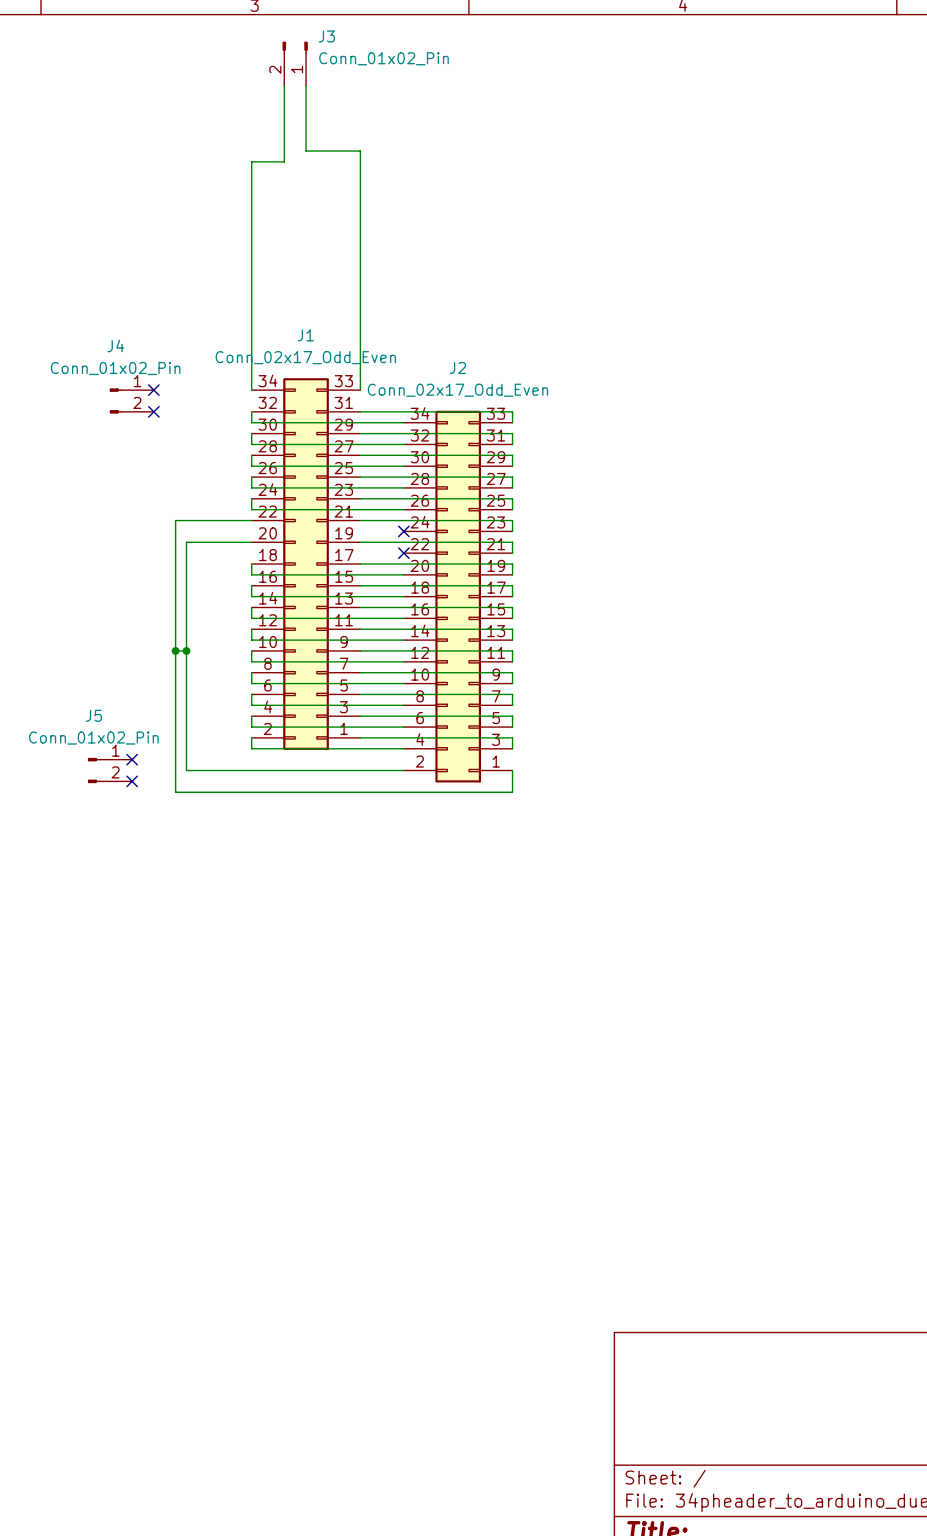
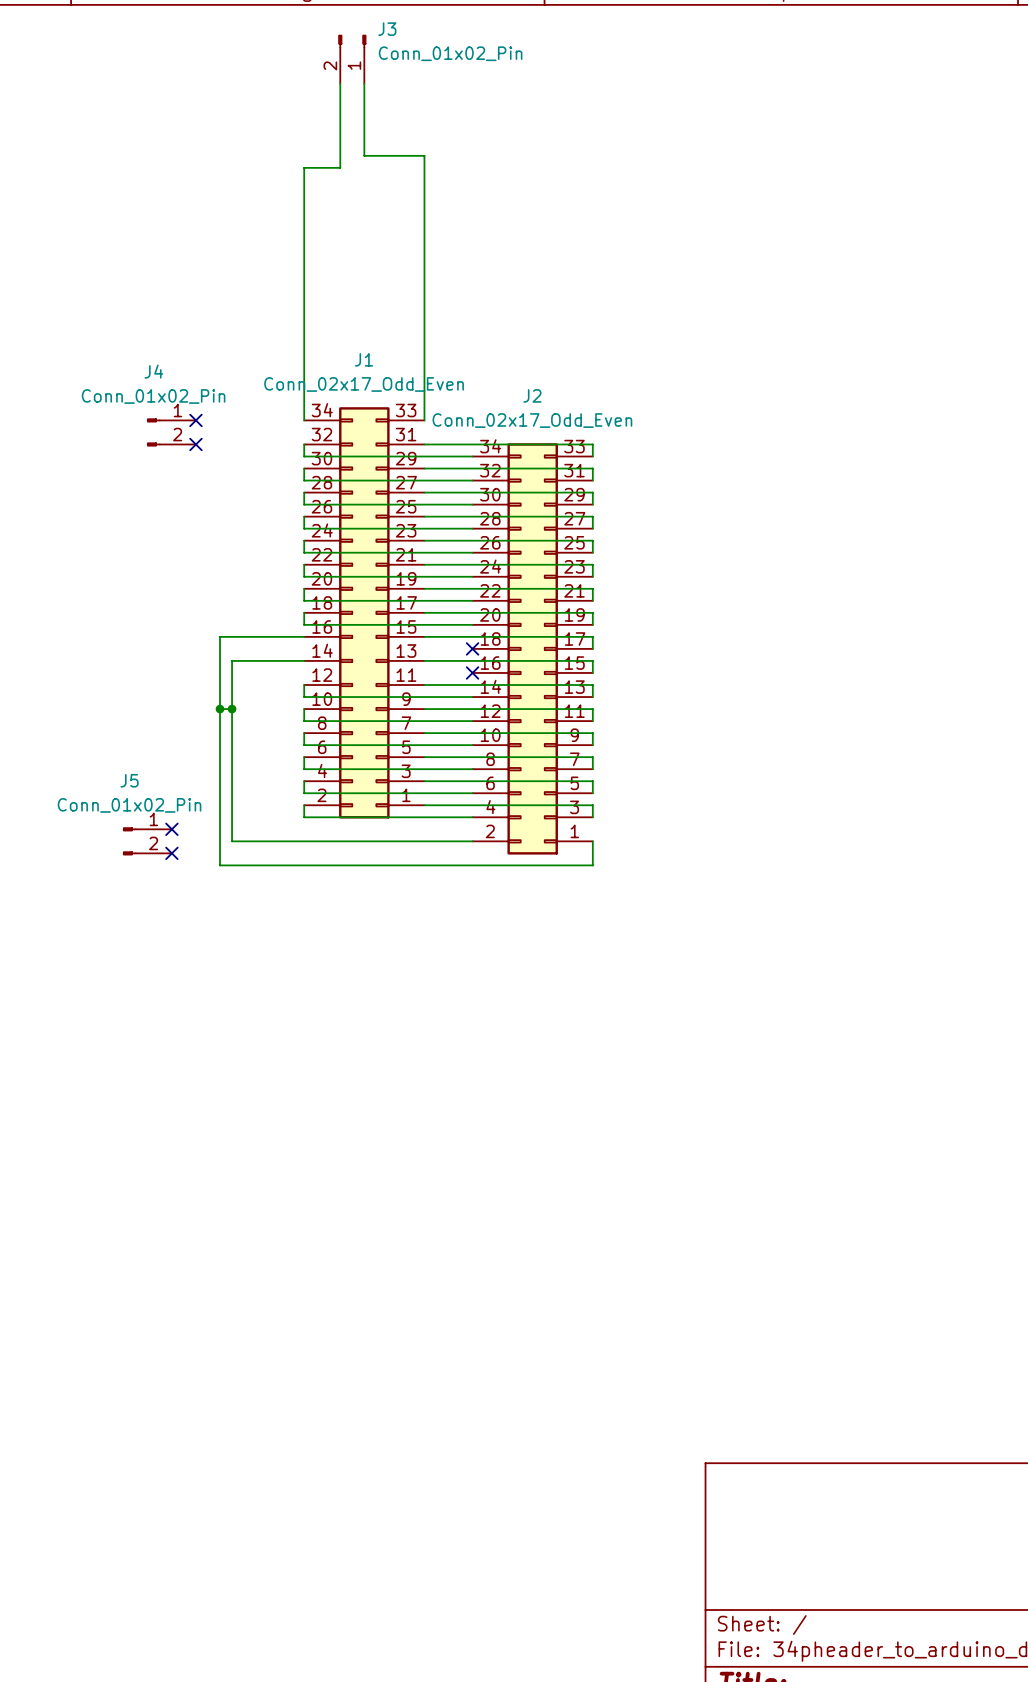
wire: (251, 520) (175, 520) (175, 585) -> (304, 636) (220, 636)
no-connect mark: (403, 531) -> none
wire: (251, 542) (186, 542) (186, 607) -> (304, 660) (232, 660)
no-connect mark: (403, 553) -> none
wire: (251, 585) (251, 596) (403, 596) -> (304, 588) (304, 600) (472, 600)
no-connect mark: none -> (472, 648)
wire: (251, 607) (251, 618) (403, 618) -> (304, 564) (304, 576) (472, 576)
no-connect mark: none -> (472, 672)

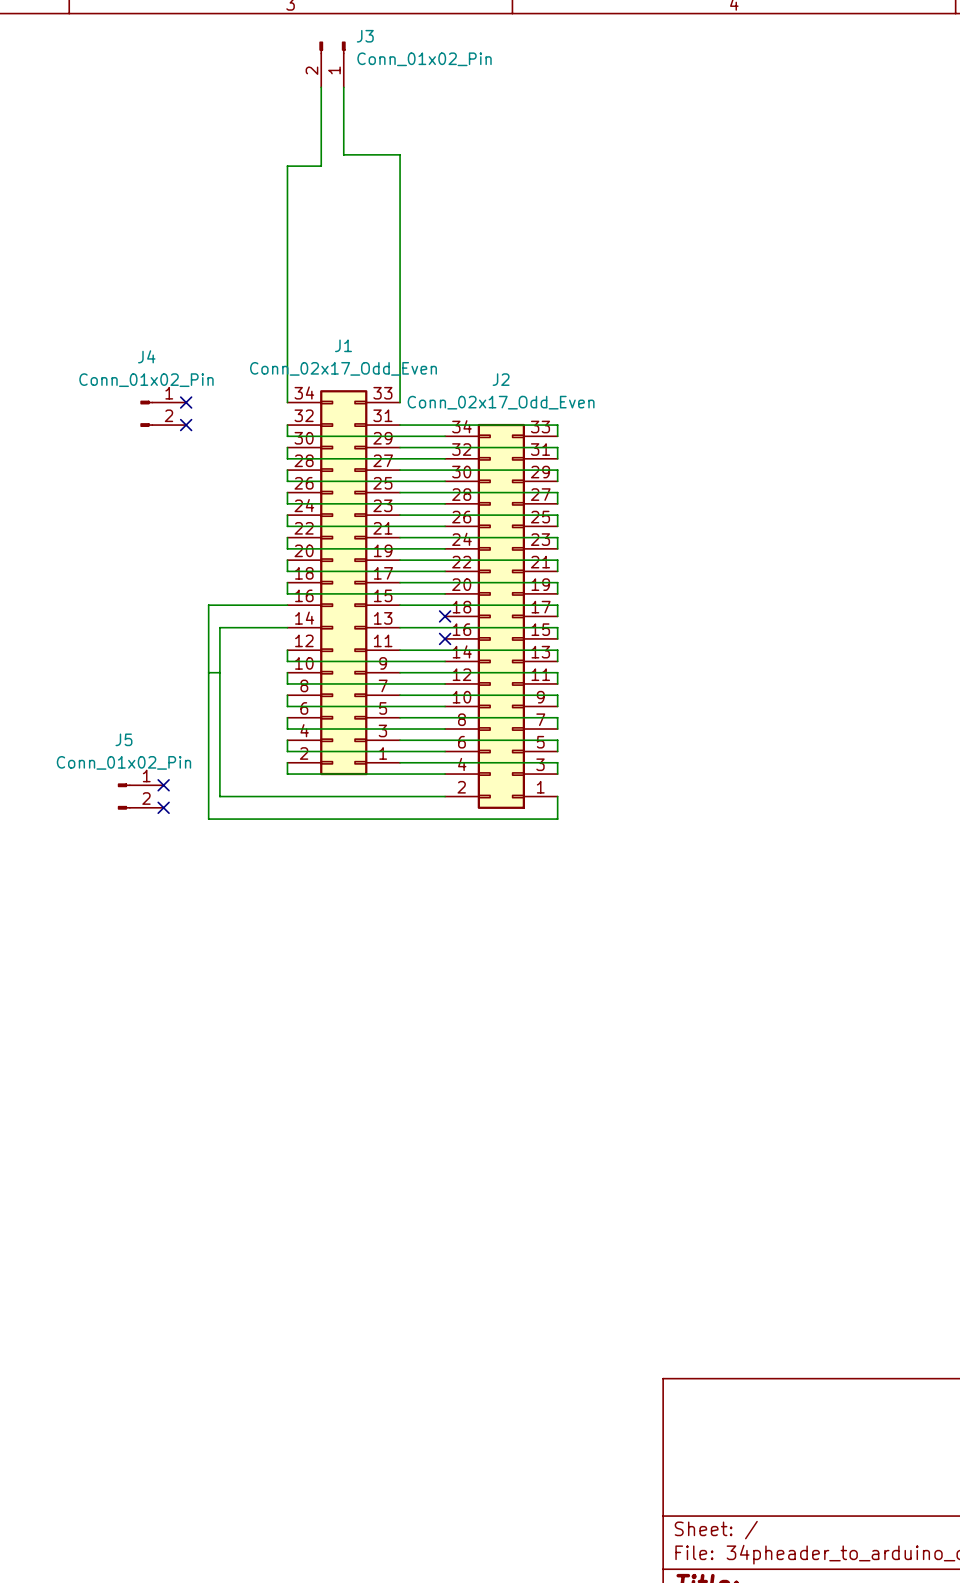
junction: (220, 709) -> none
junction: (232, 709) -> none

